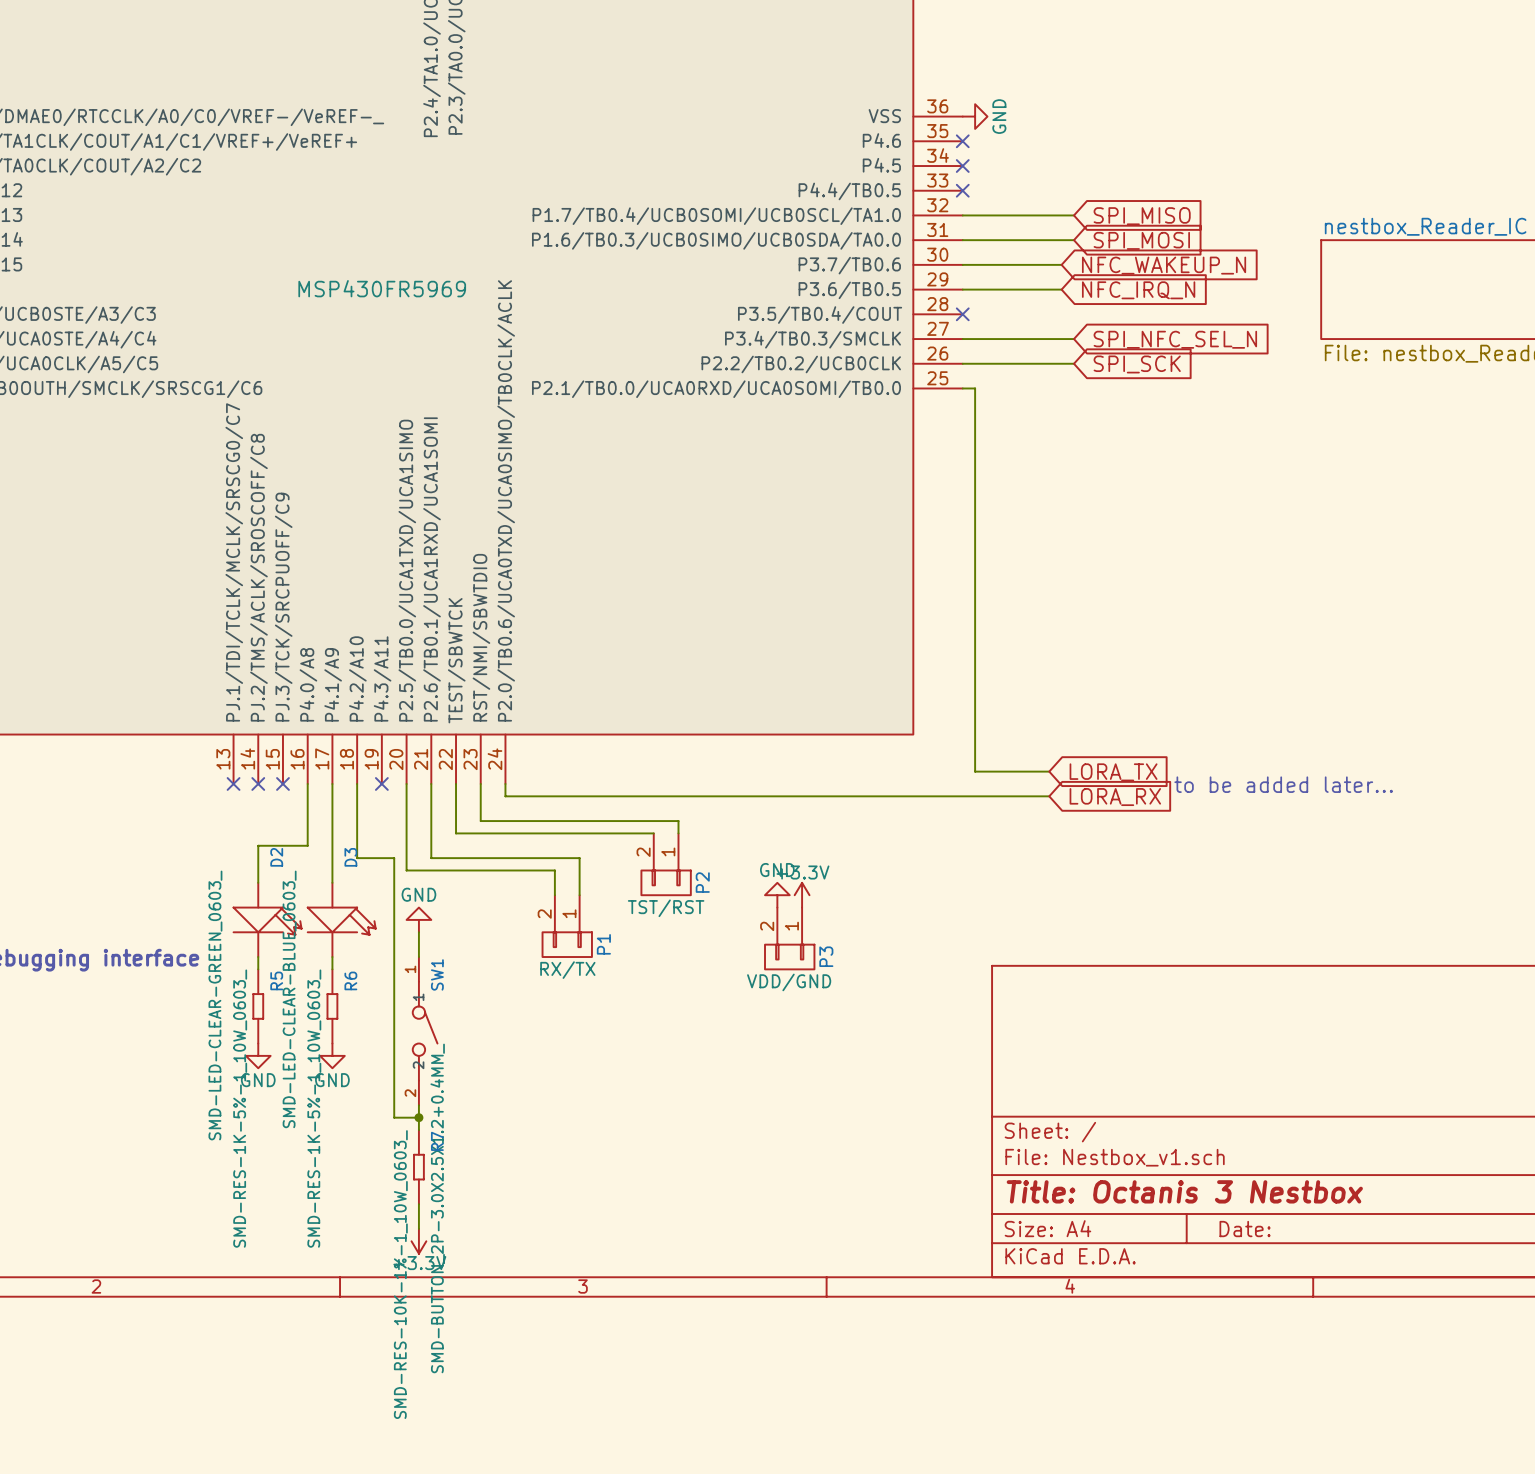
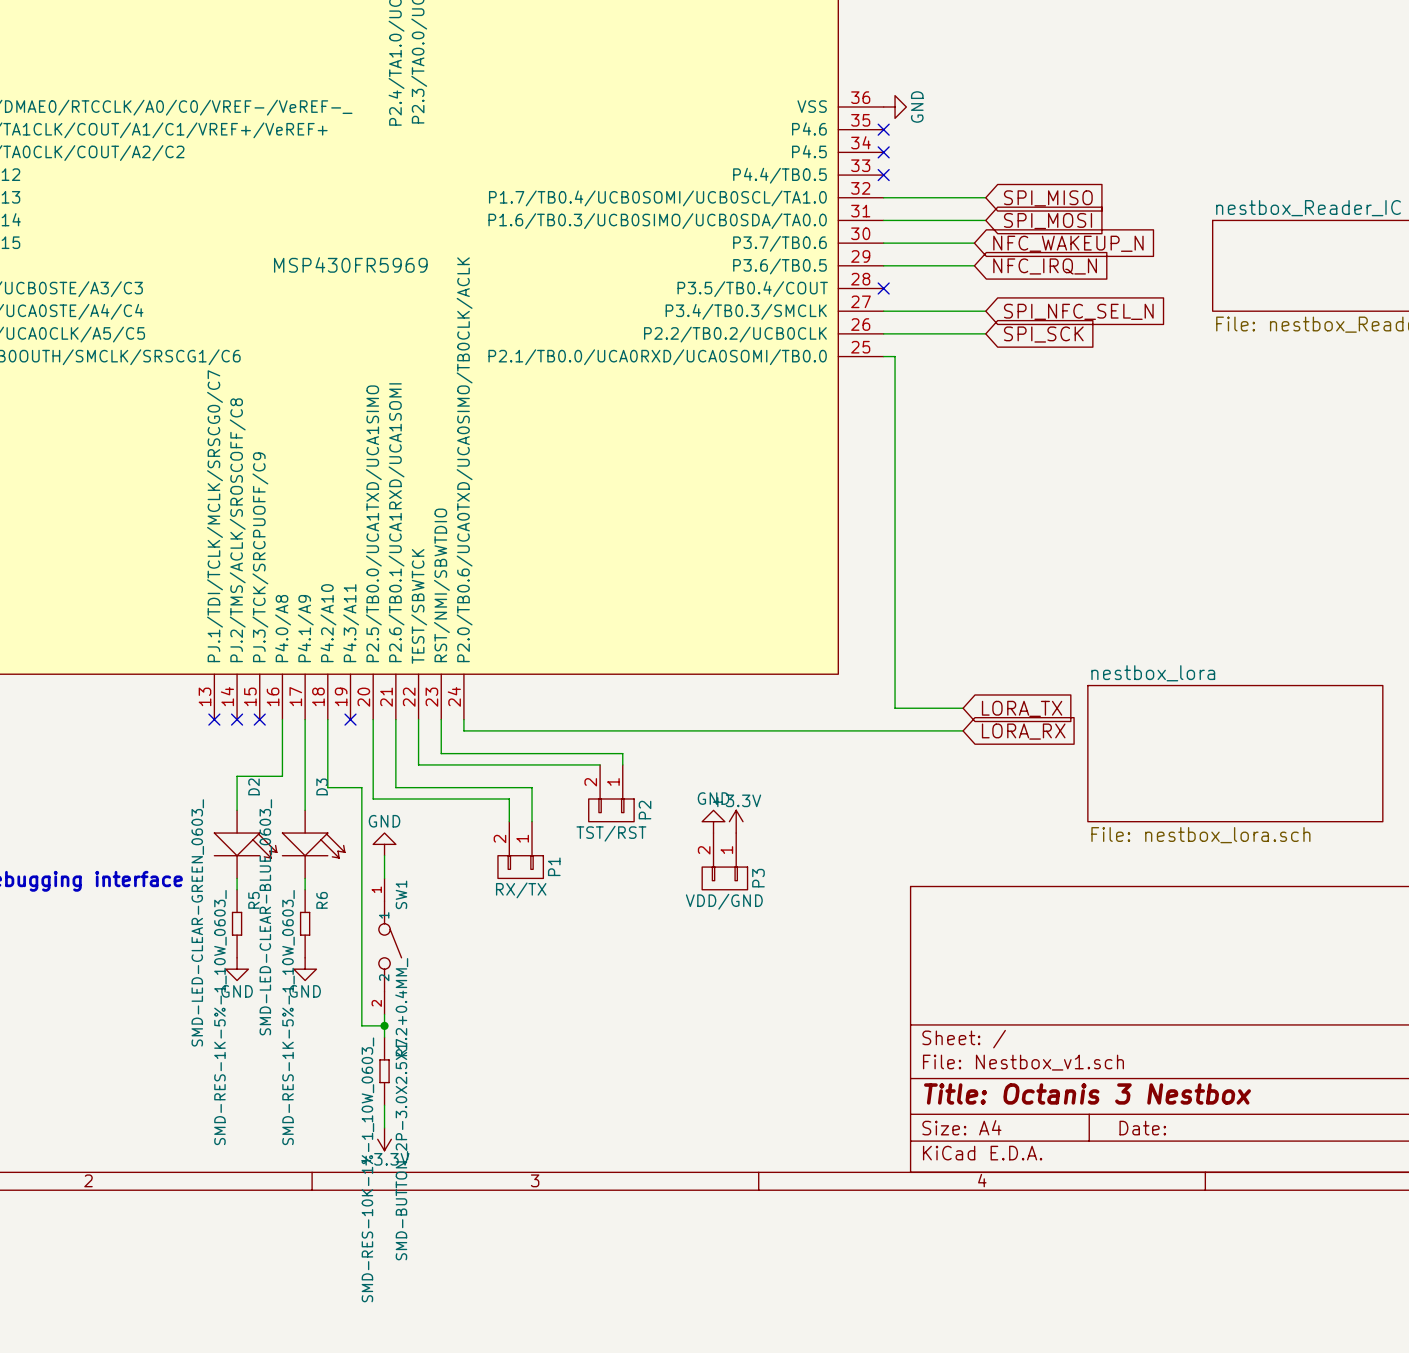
text: to be added later... (1283, 784) -> none
sheet nestbox_lora: none -> File: nestbox_lora.sch (1235, 753)

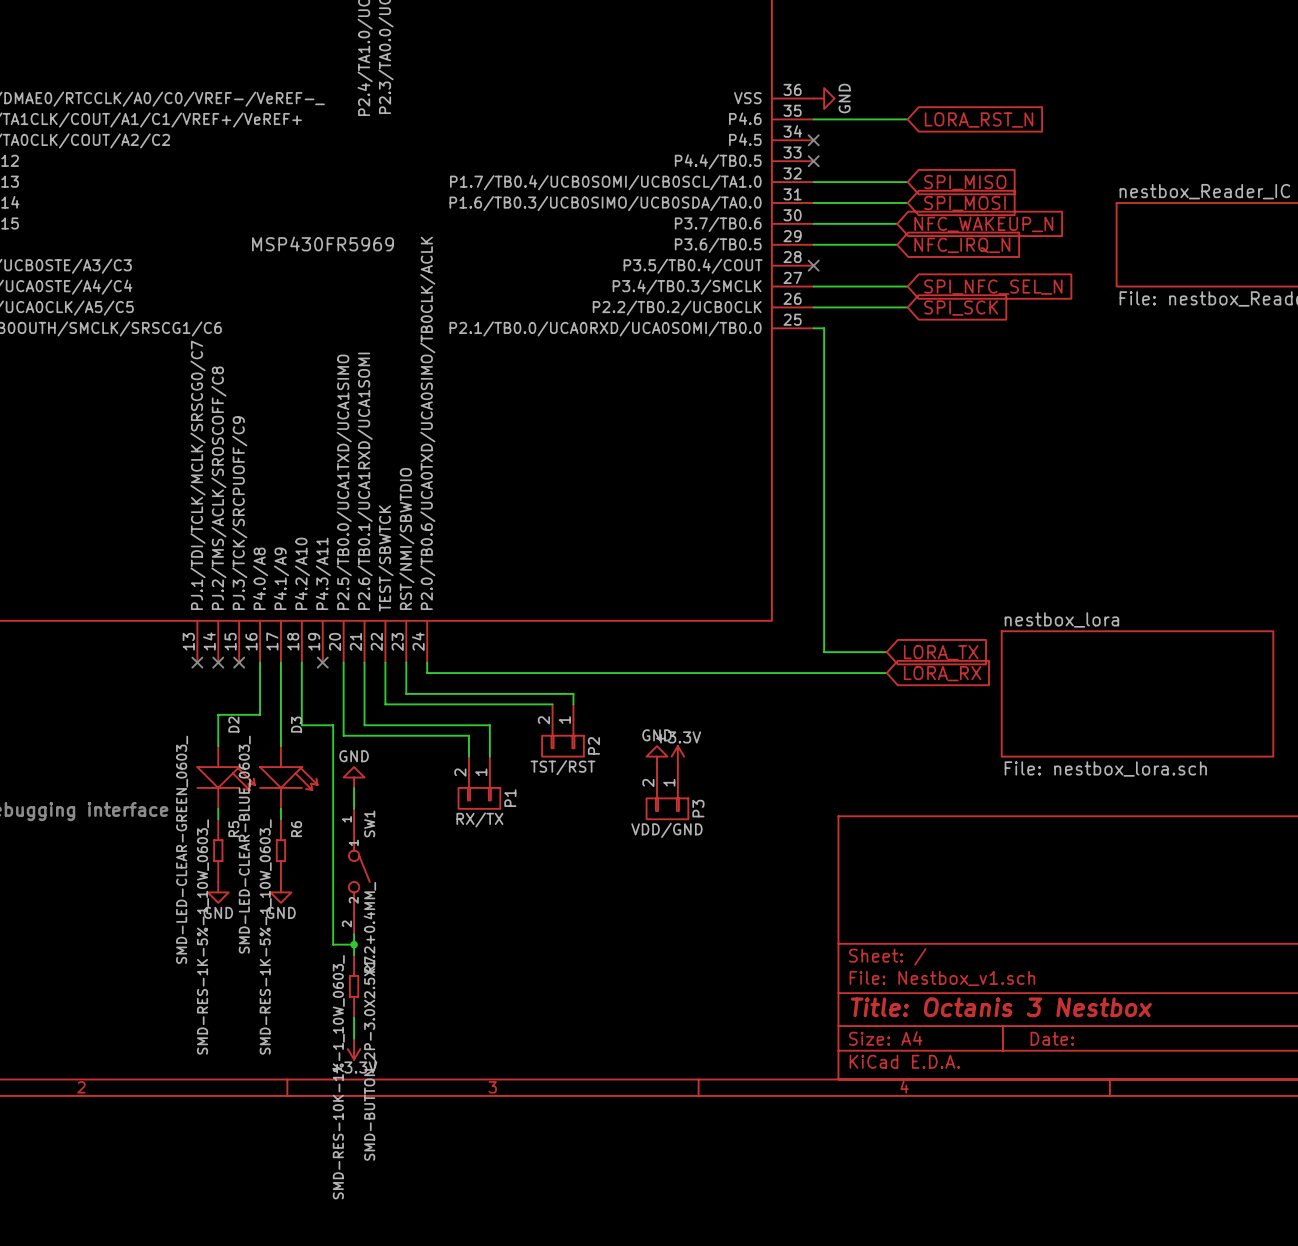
wire: none -> (813, 119) (907, 119)
no-connect mark: (883, 129) -> none
global label: none -> LORA_RST_N (979, 120)

